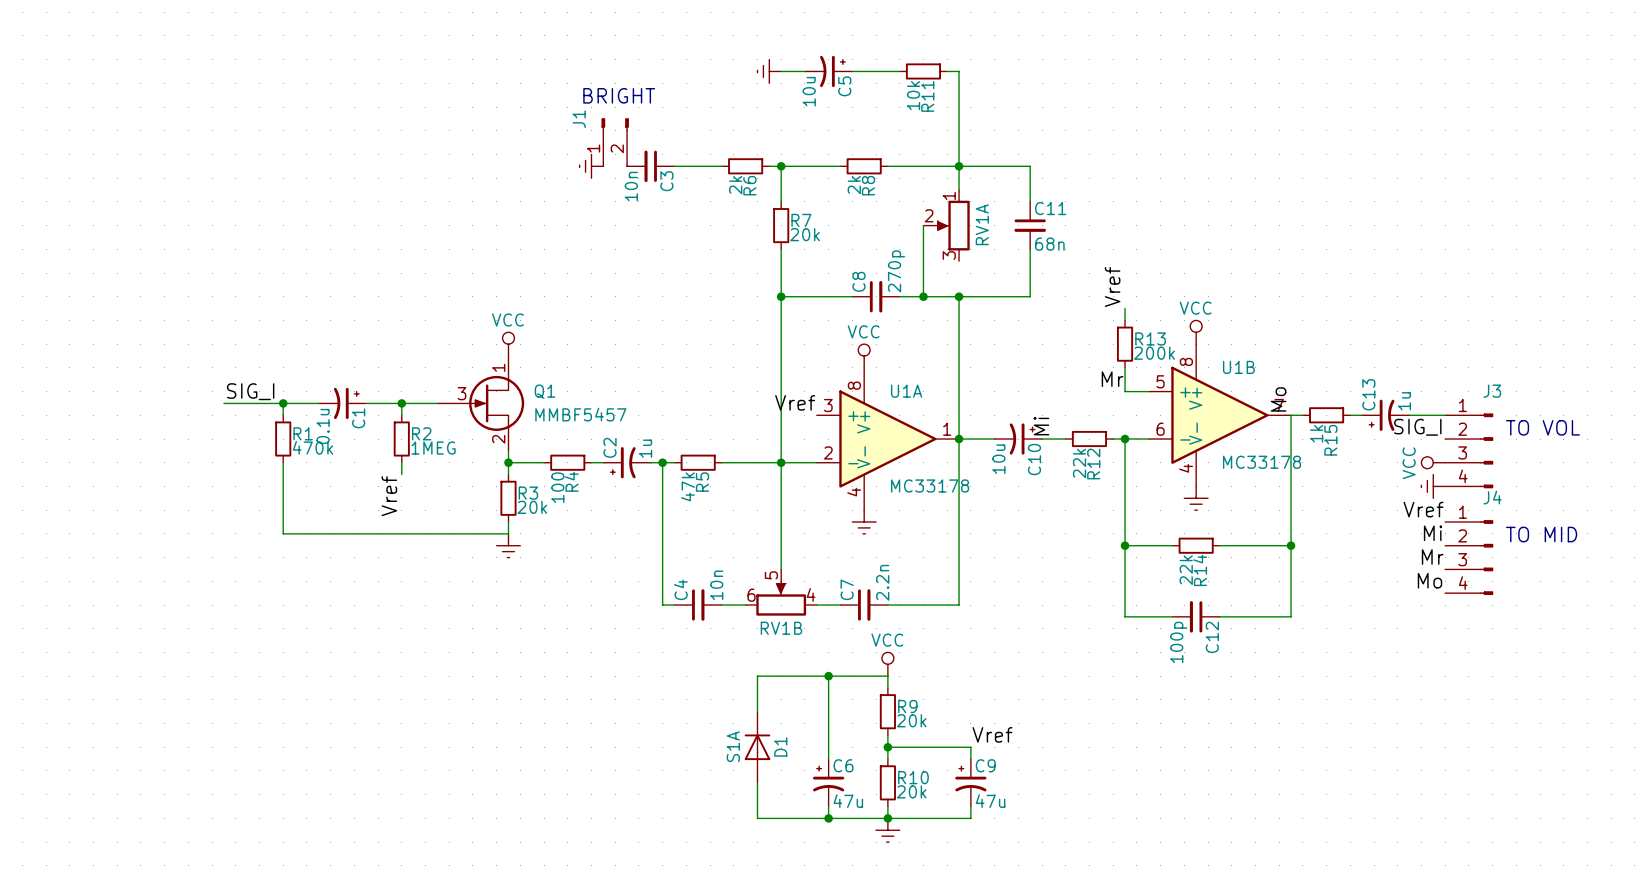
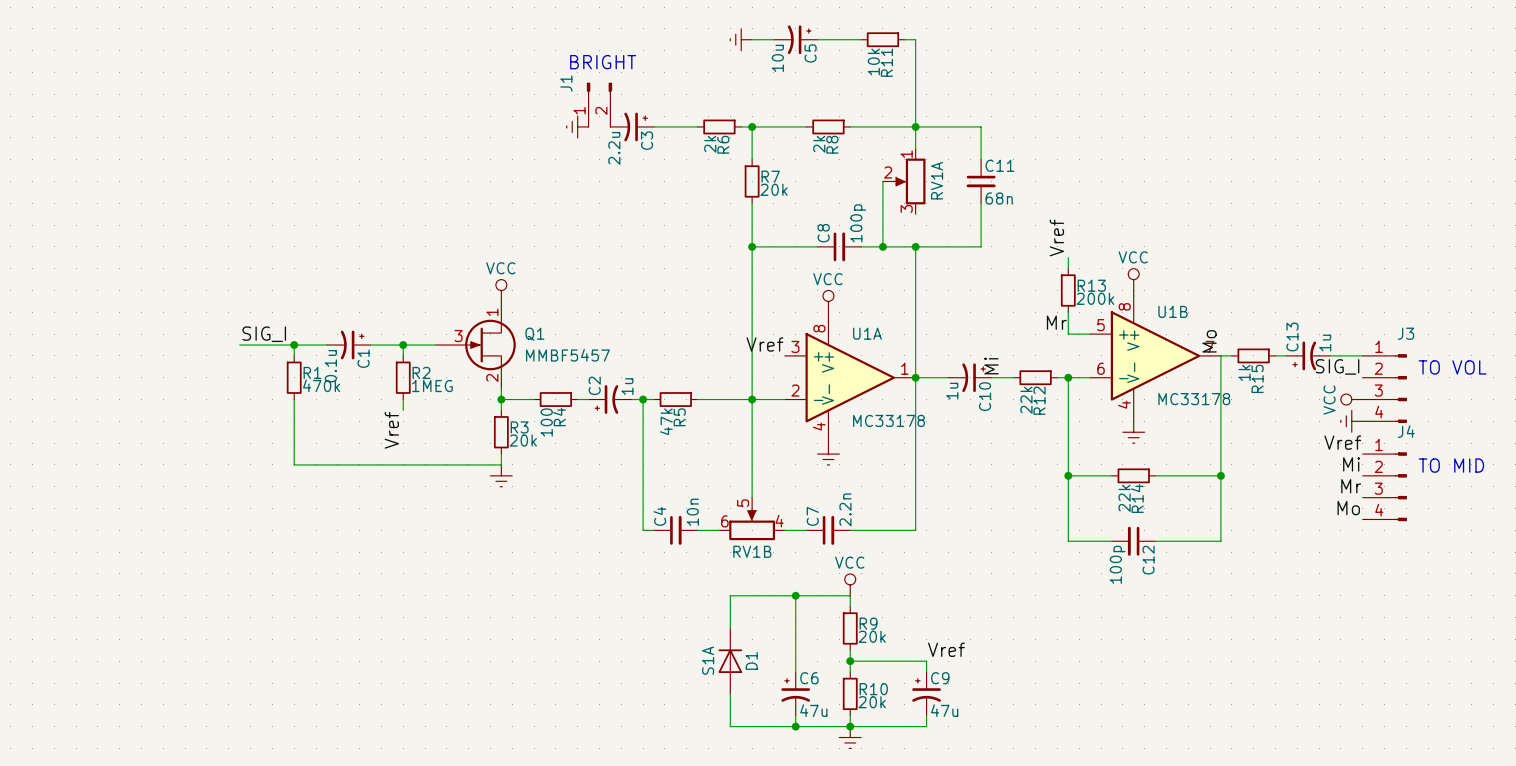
C3 symbol: [627, 150, 675, 183] -> [610, 112, 654, 142]
C3 value: 10n (631, 186) -> 2.2u (614, 148)
C8 value: 270p (896, 271) -> 100p (858, 223)
C10 value: 10u (998, 459) -> 1u (952, 391)

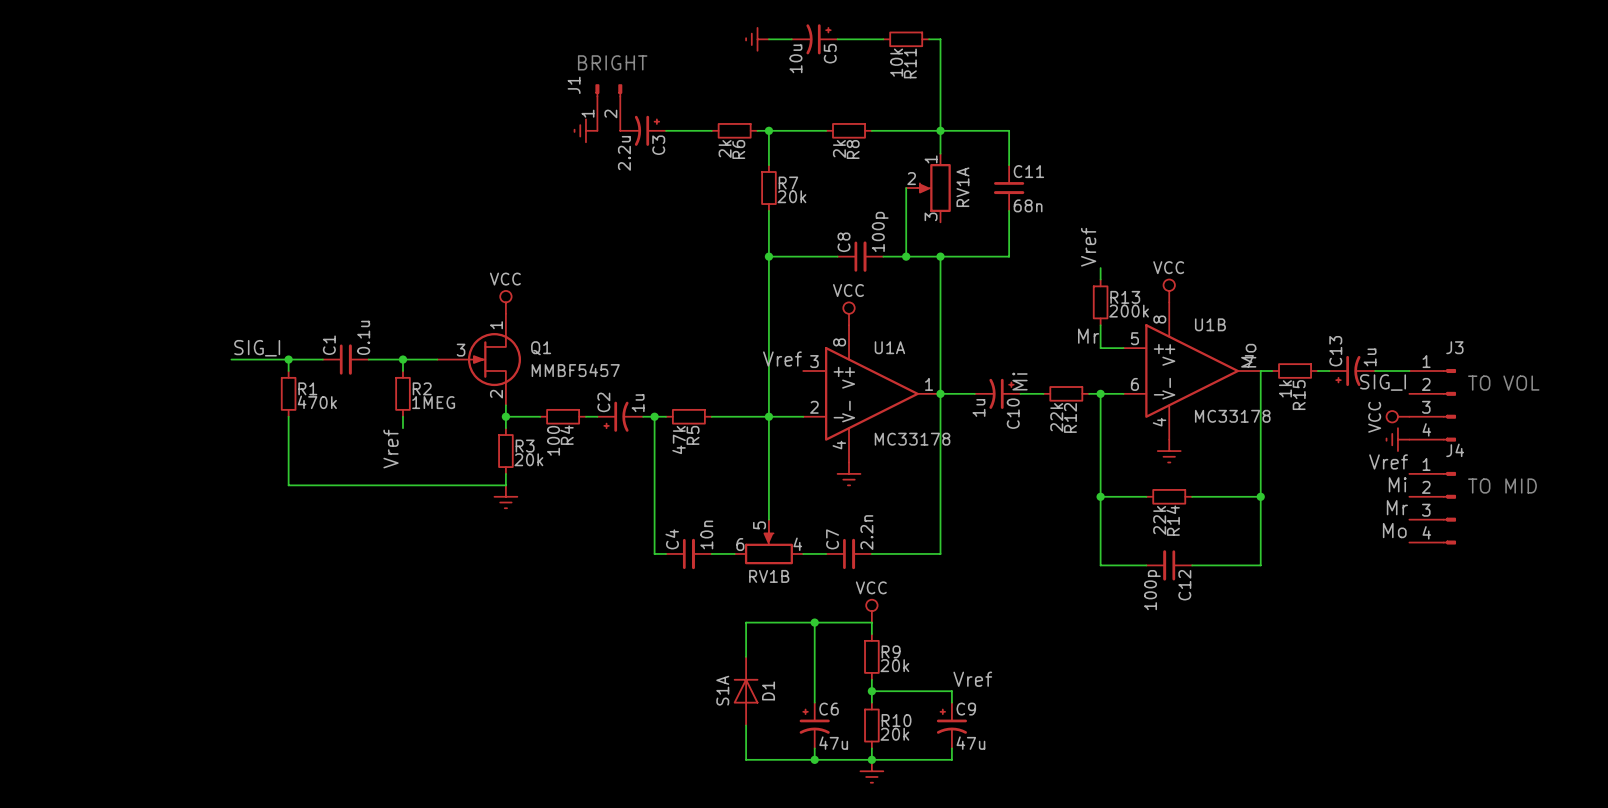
C1 symbol: [326, 330, 371, 360] -> [322, 344, 369, 375]
C1 name position: C1 (363, 358) -> C1 (329, 345)
C1 value position: 0.1u (330, 366) -> 0.1u (363, 337)

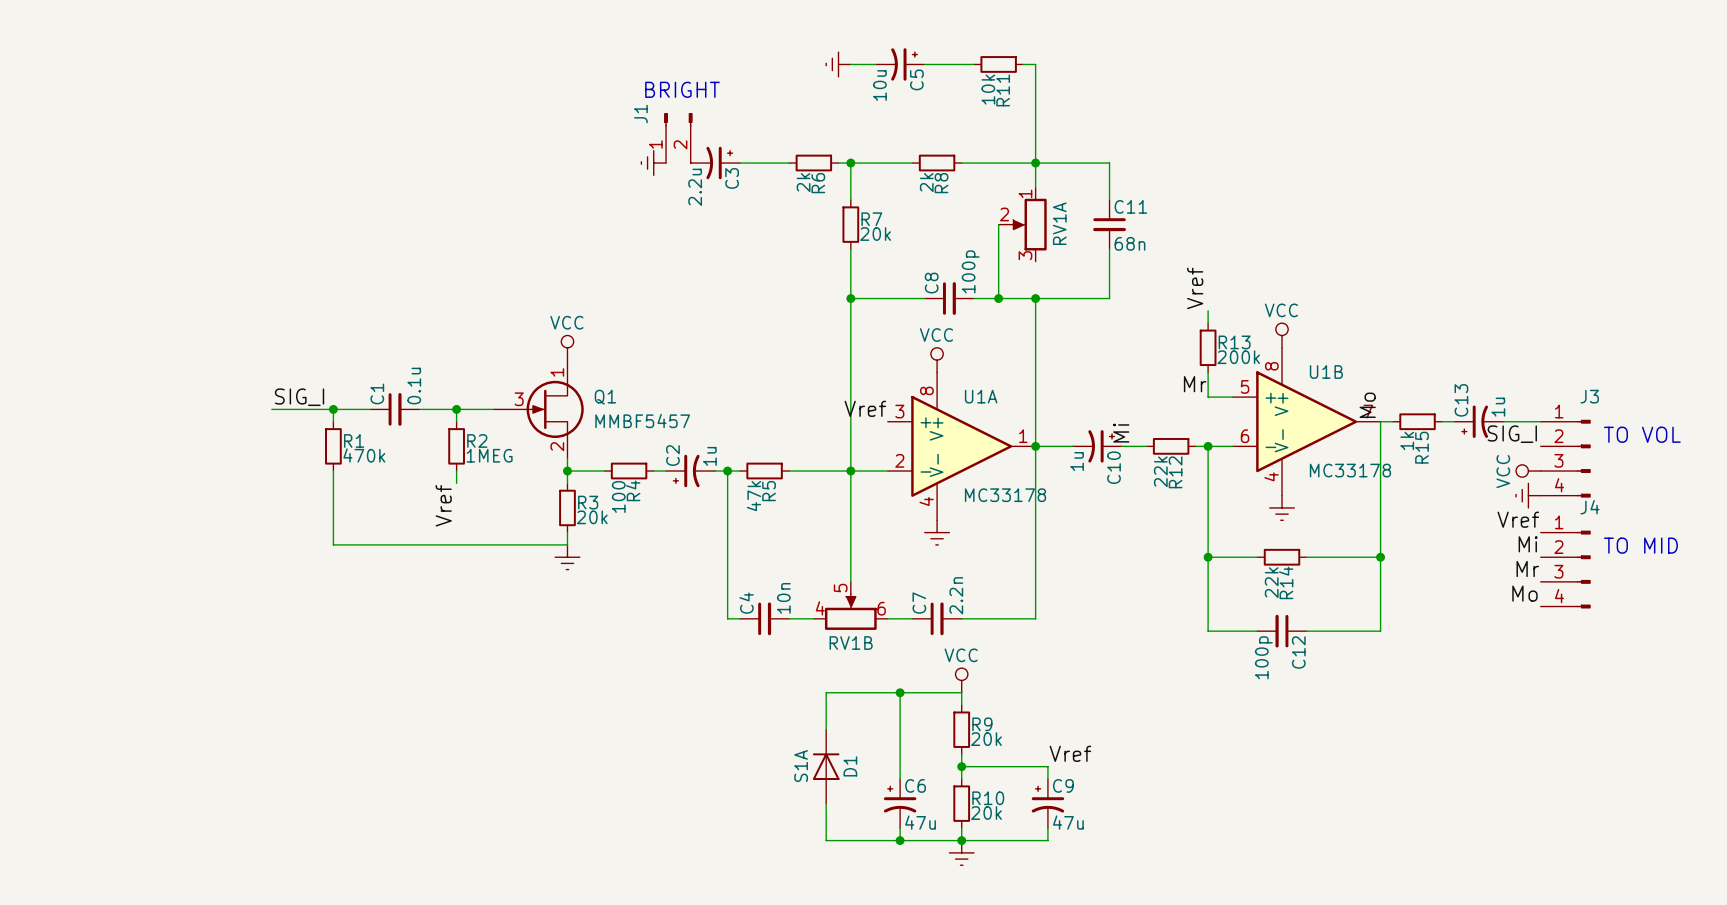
RV1B flip: as is (768, 547) -> left-right (850, 612)

